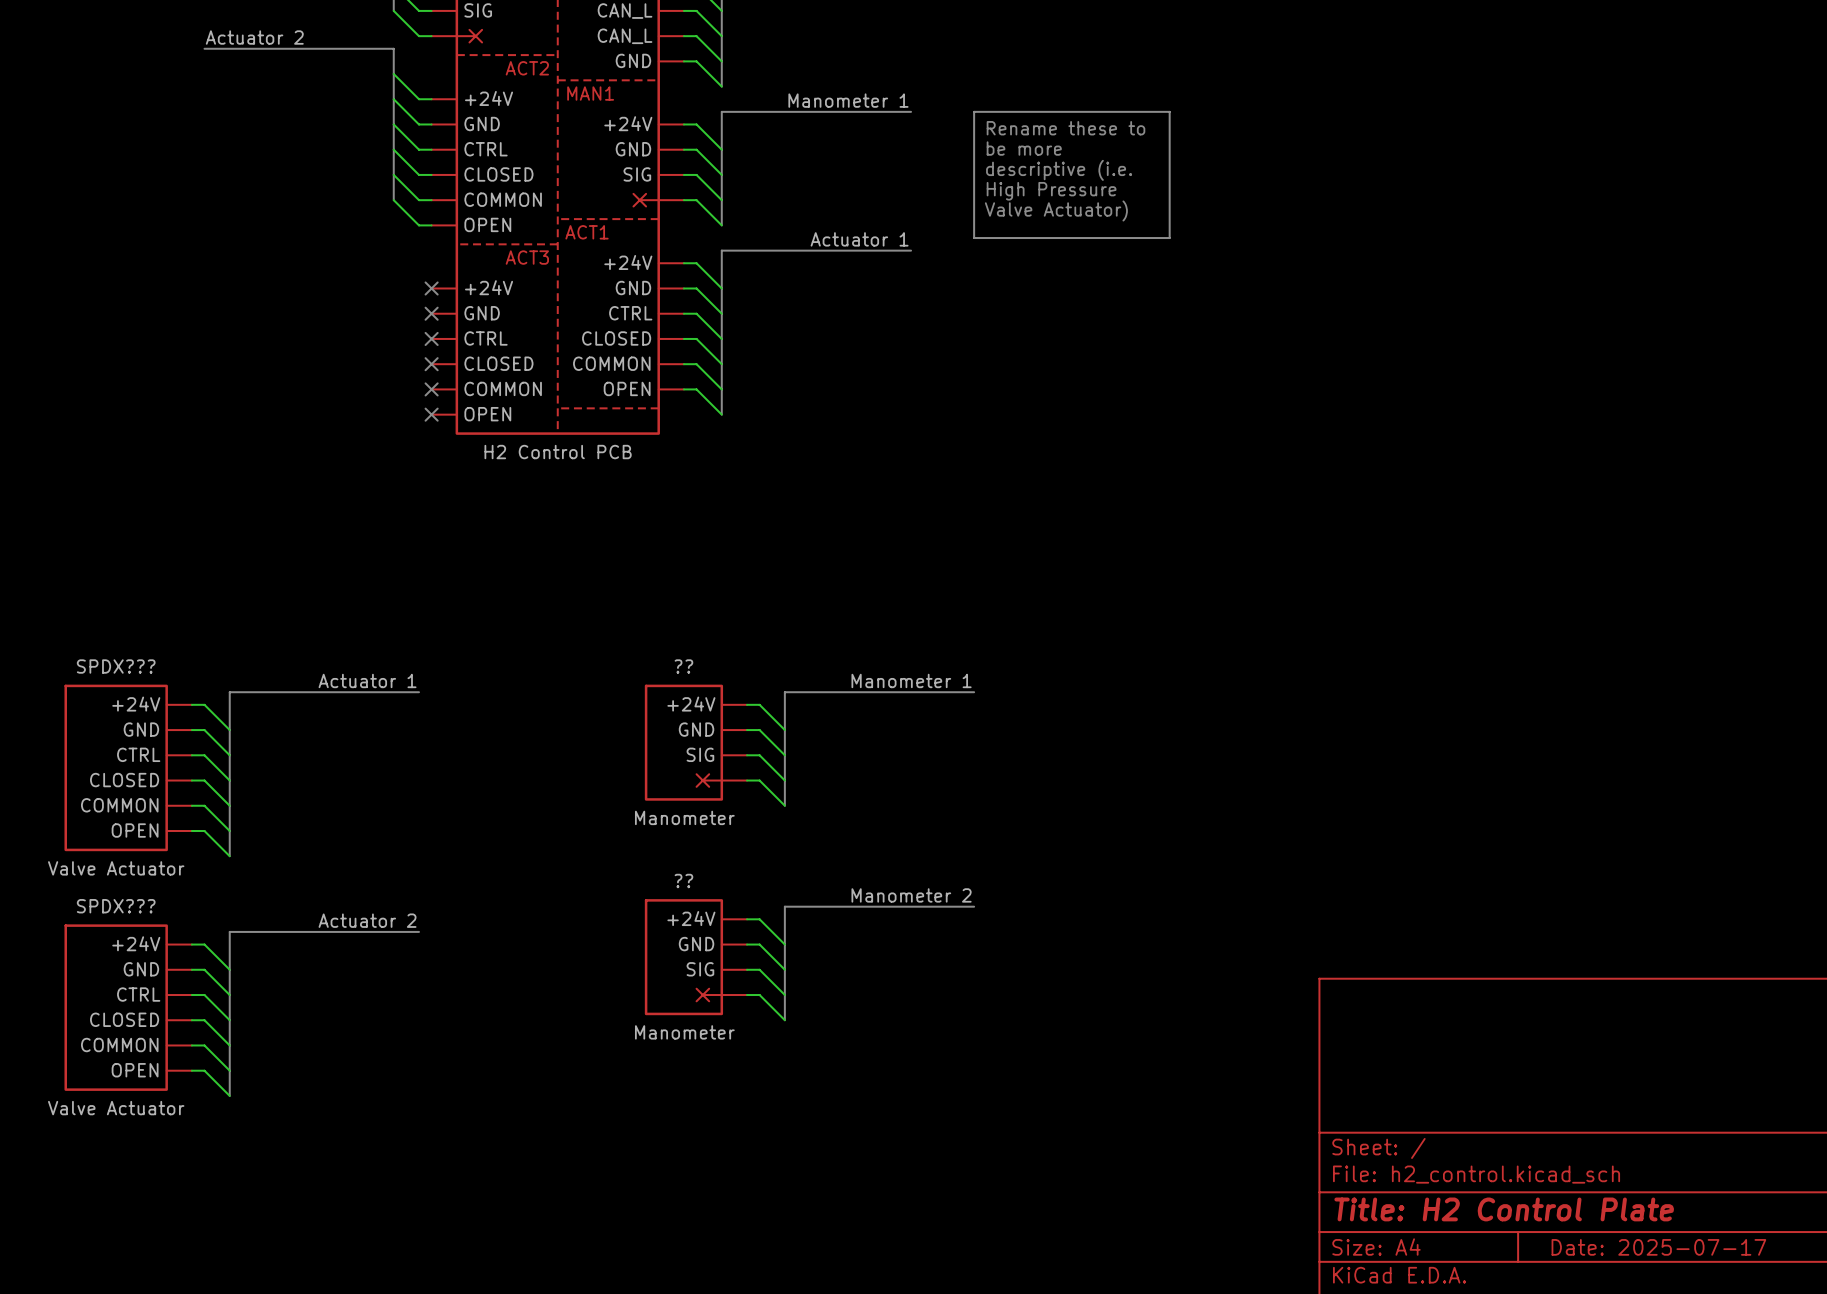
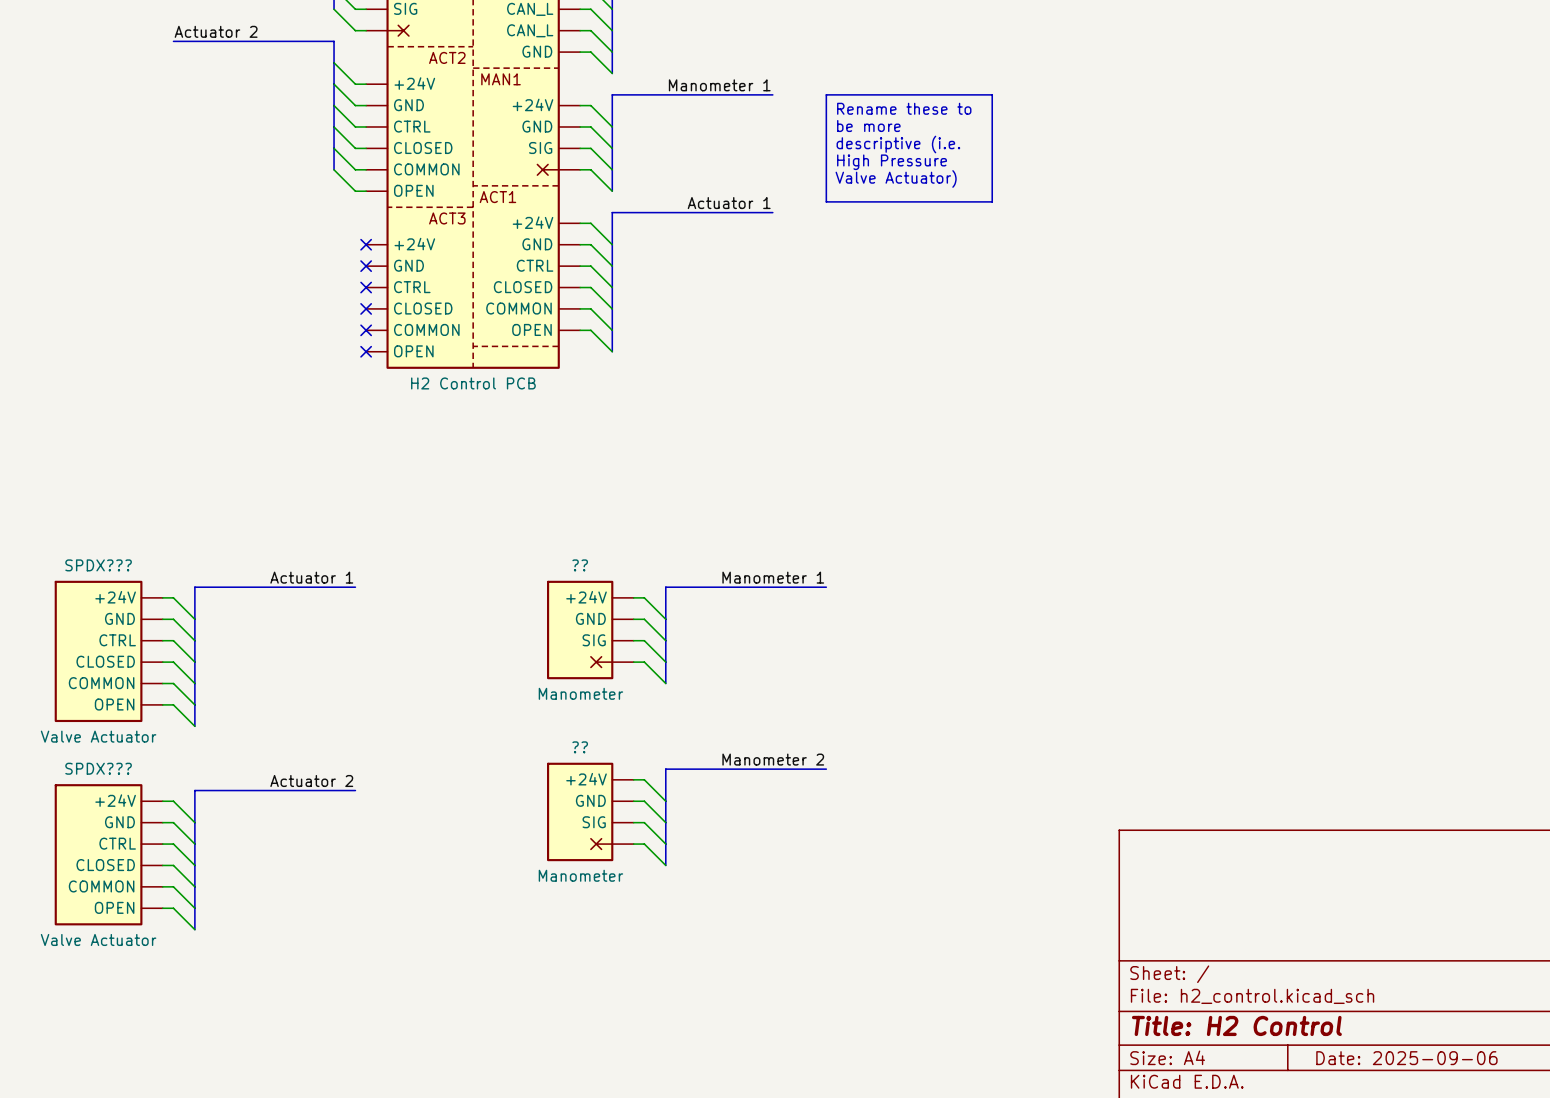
title block: Title: H2 Control Plate (1504, 1209) -> Title: H2 Control (1236, 1025)
title block: Date: 2025-07-17 (1658, 1247) -> Date: 2025-09-06 (1406, 1058)

